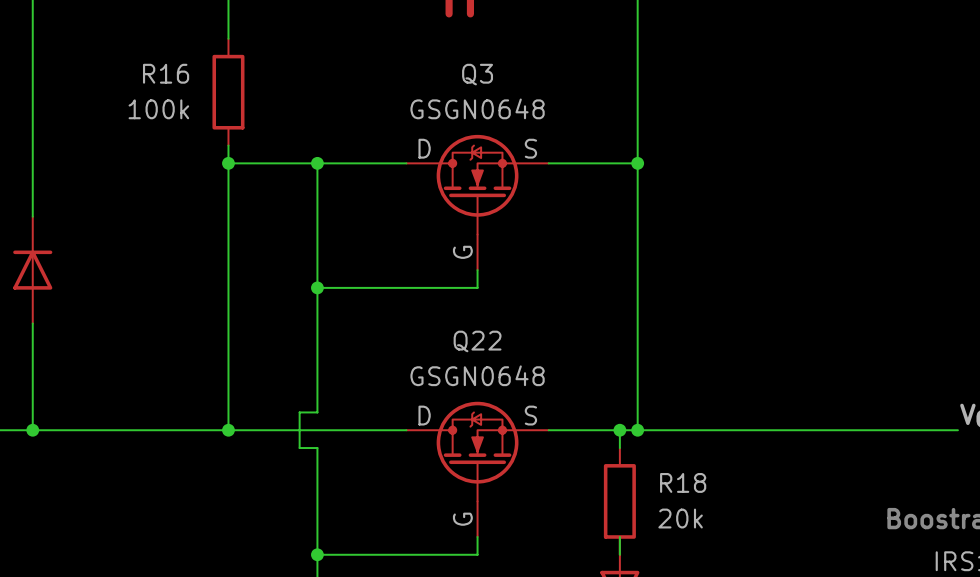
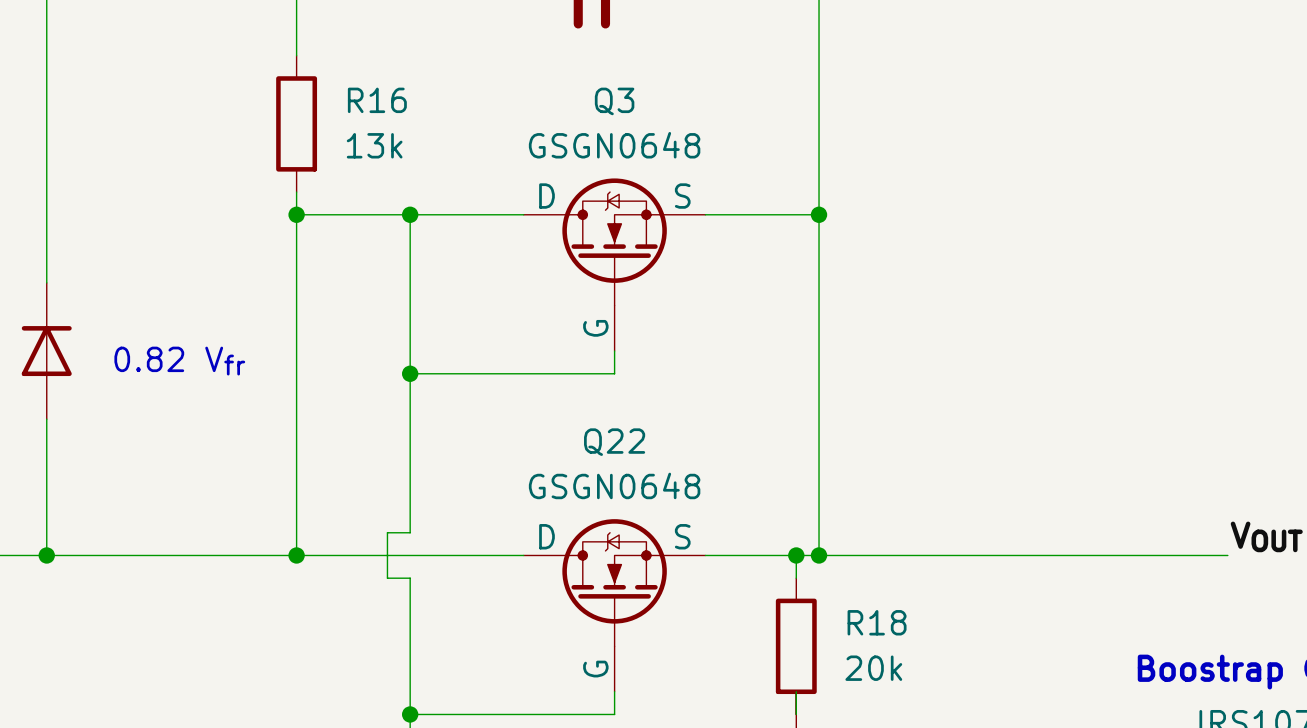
R16 name position: R16 (166, 73) -> R16 (377, 100)
R16 value: 100k (158, 109) -> 13k (374, 145)
text: none -> 0.82 Vfr (179, 361)

